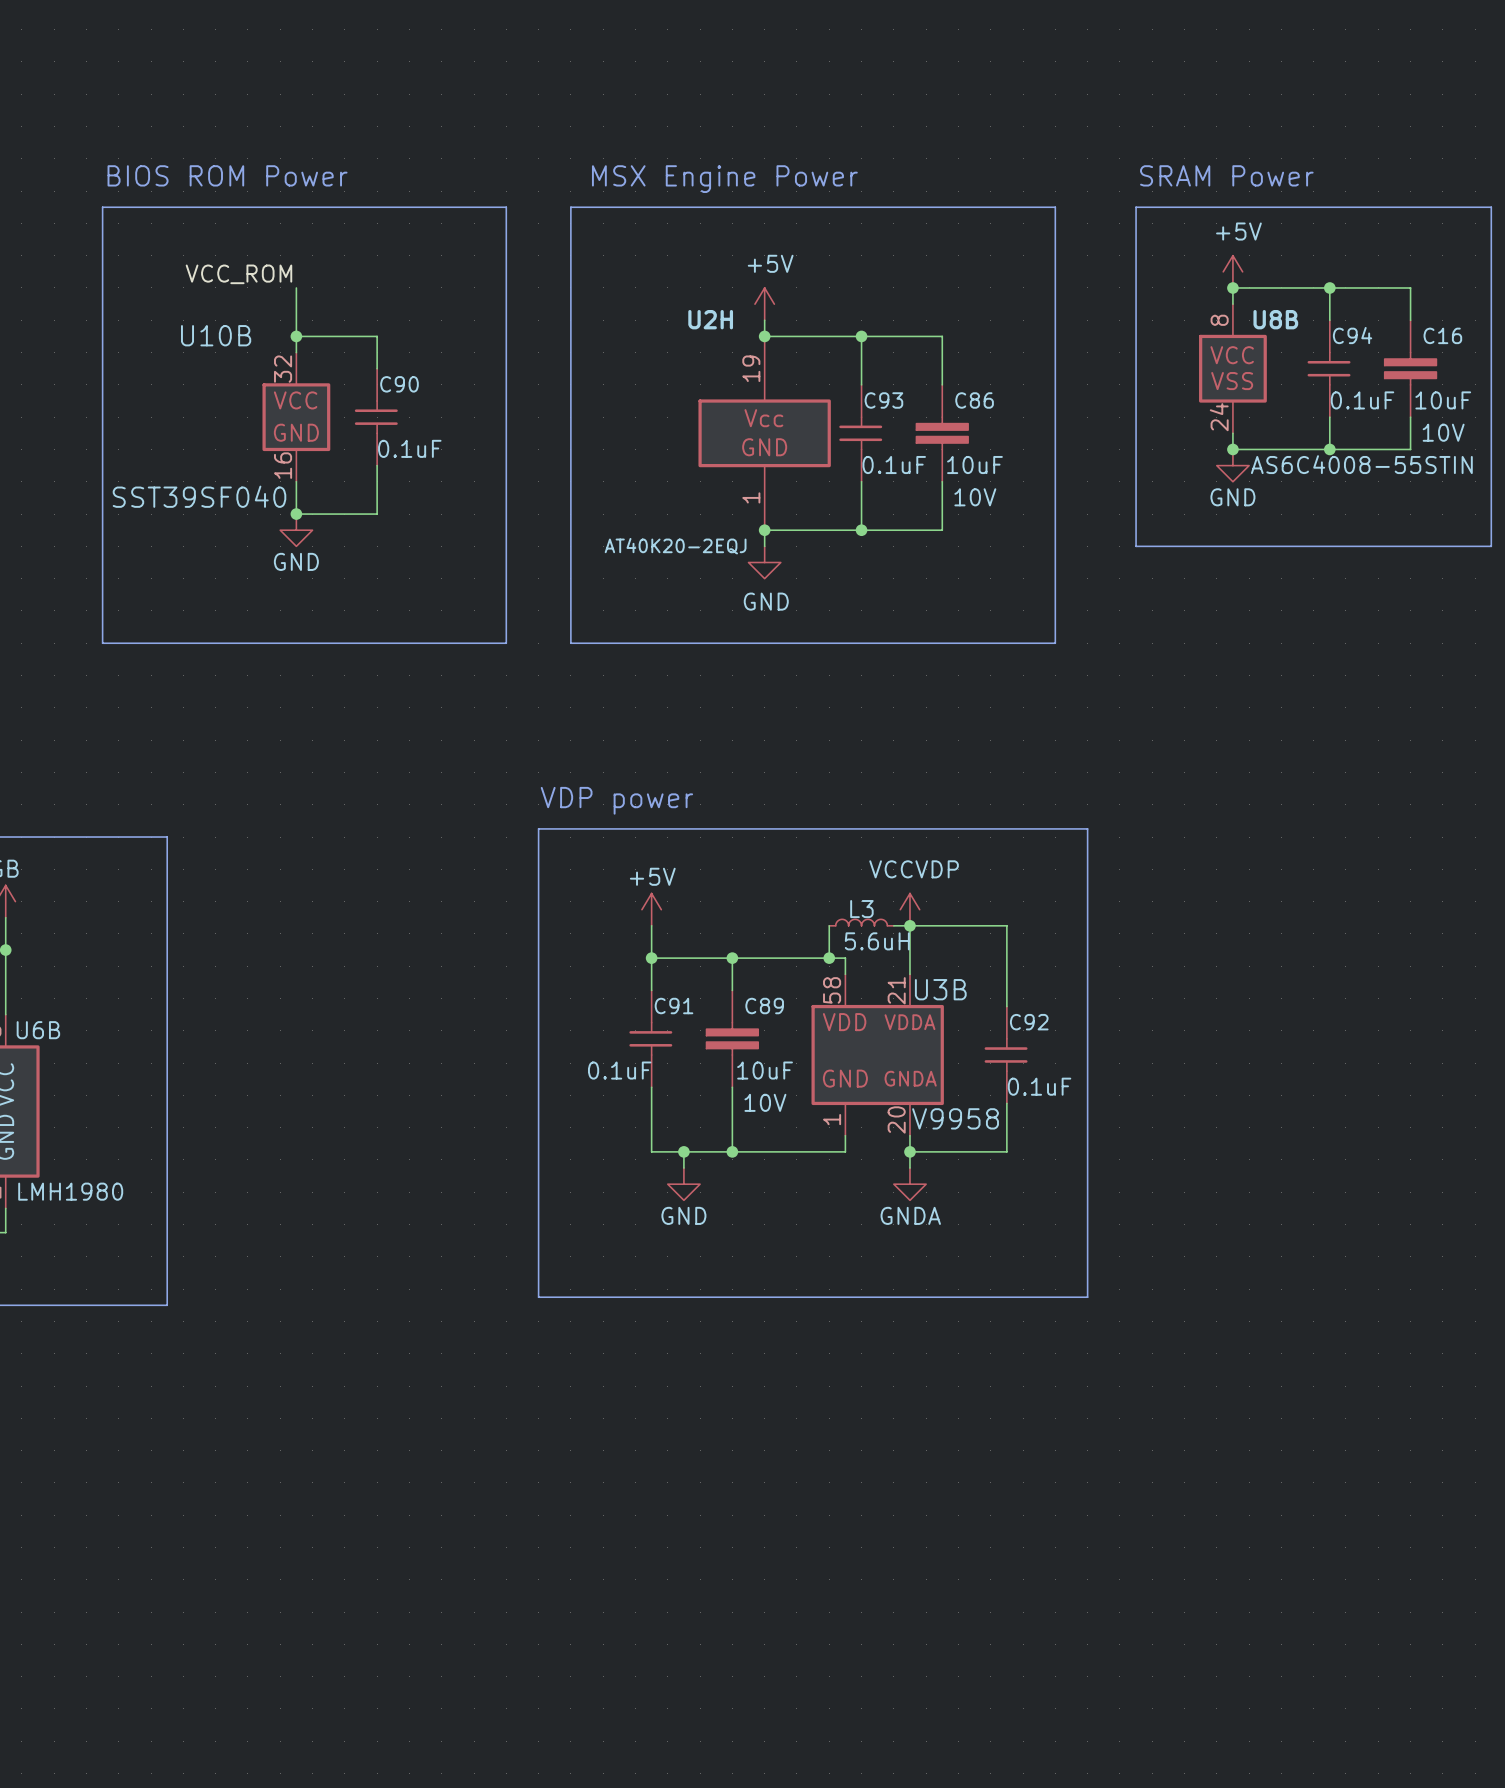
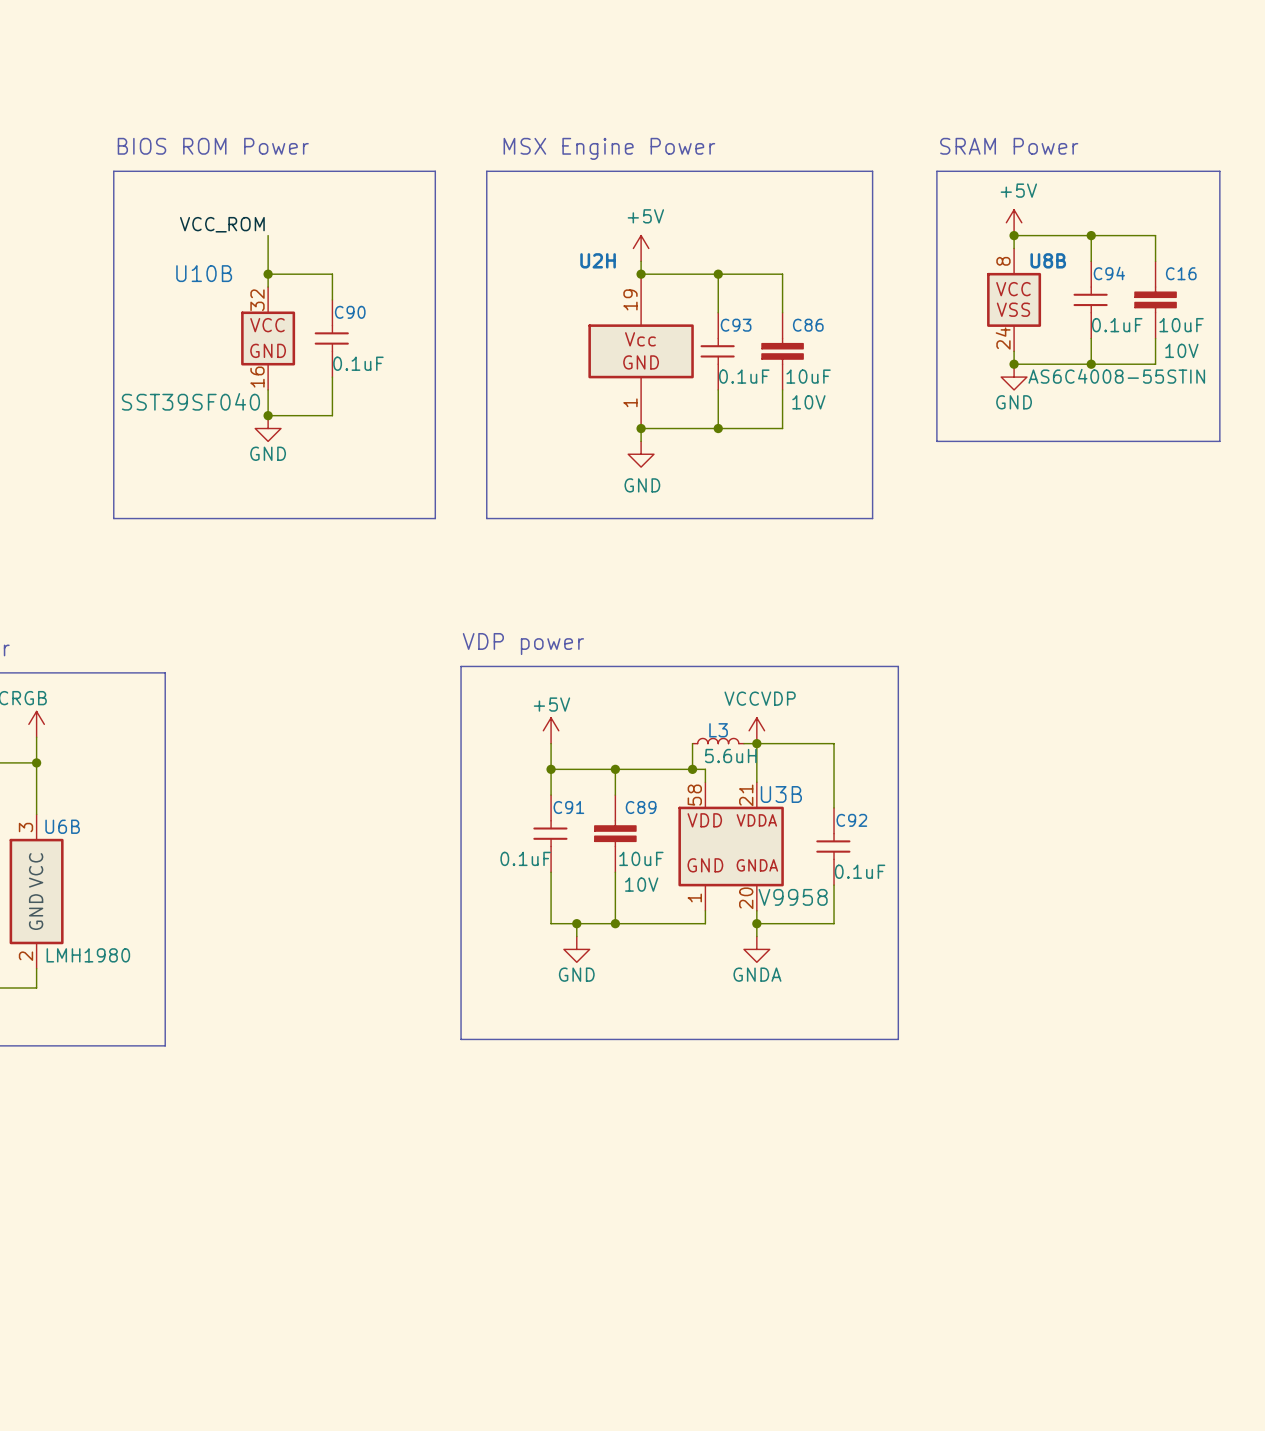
U2H value: AT40K20-2EQJ (675, 546) -> none

